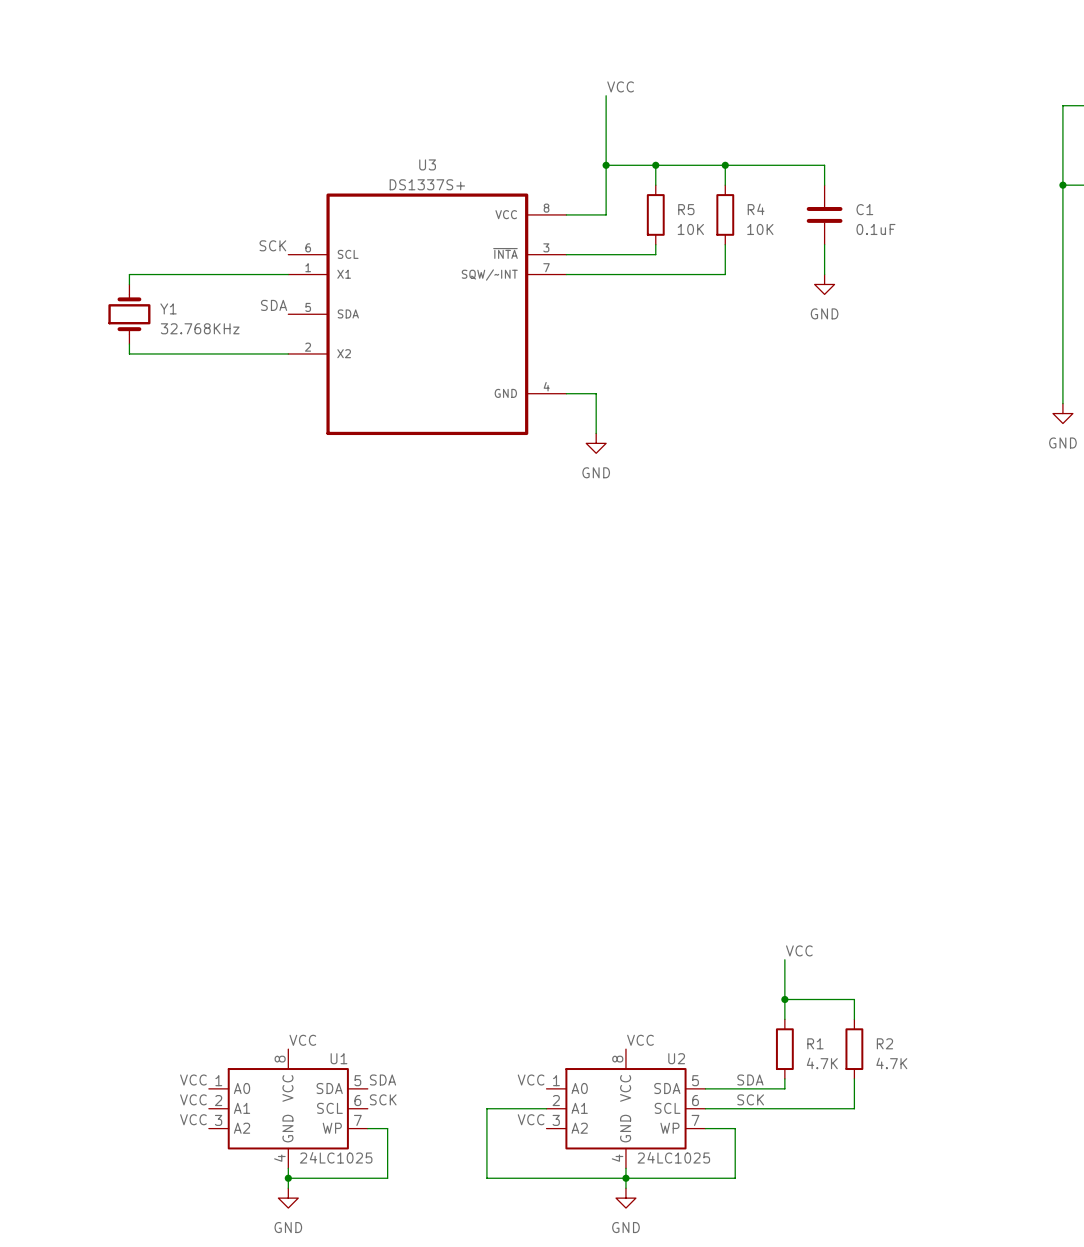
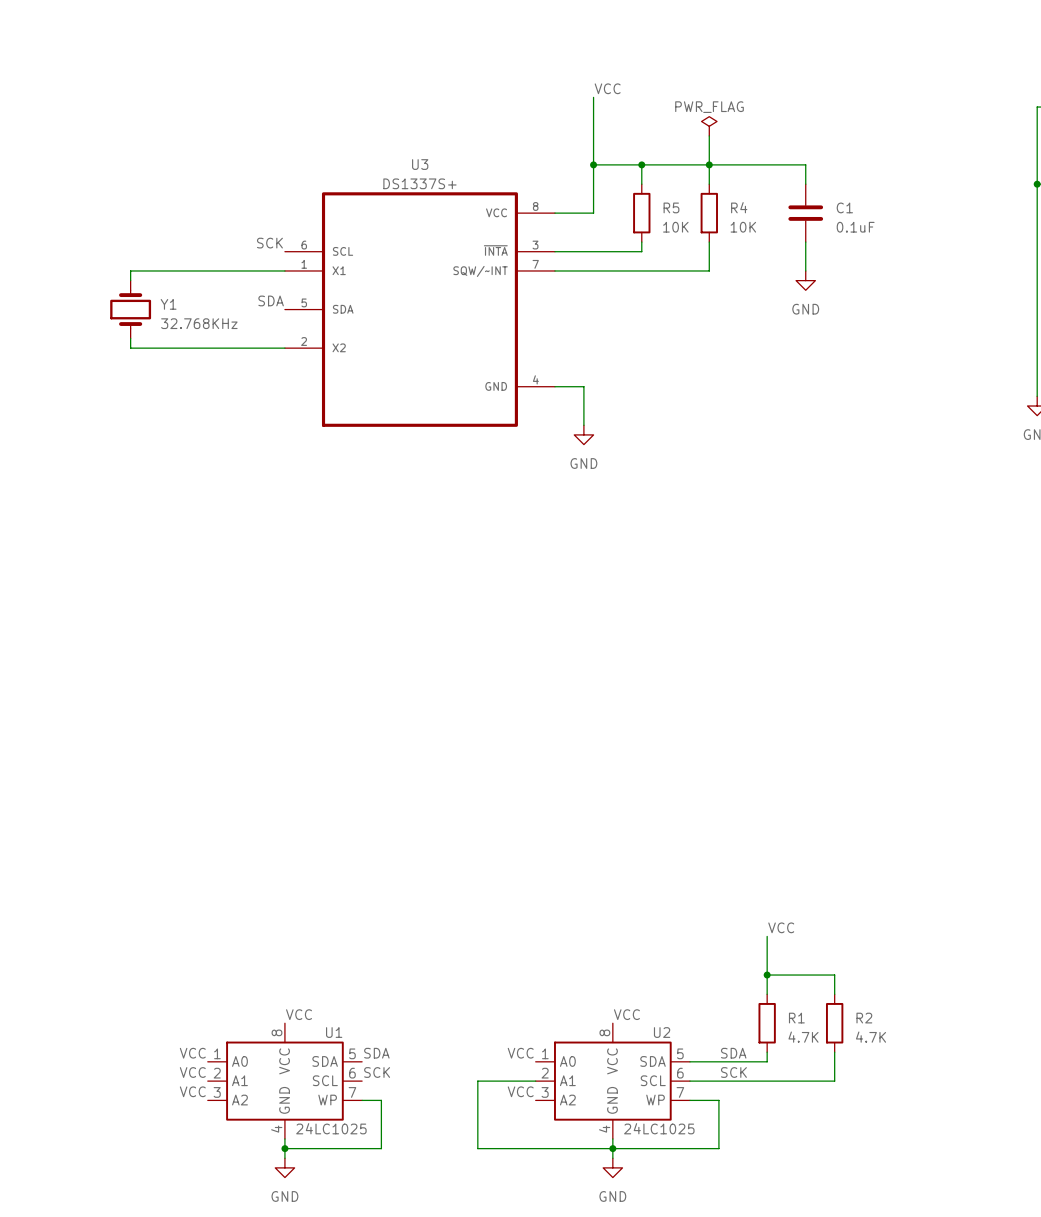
power symbol: none -> PWR_FLAG (709, 126)
wire: none -> (709, 135) (709, 164)

